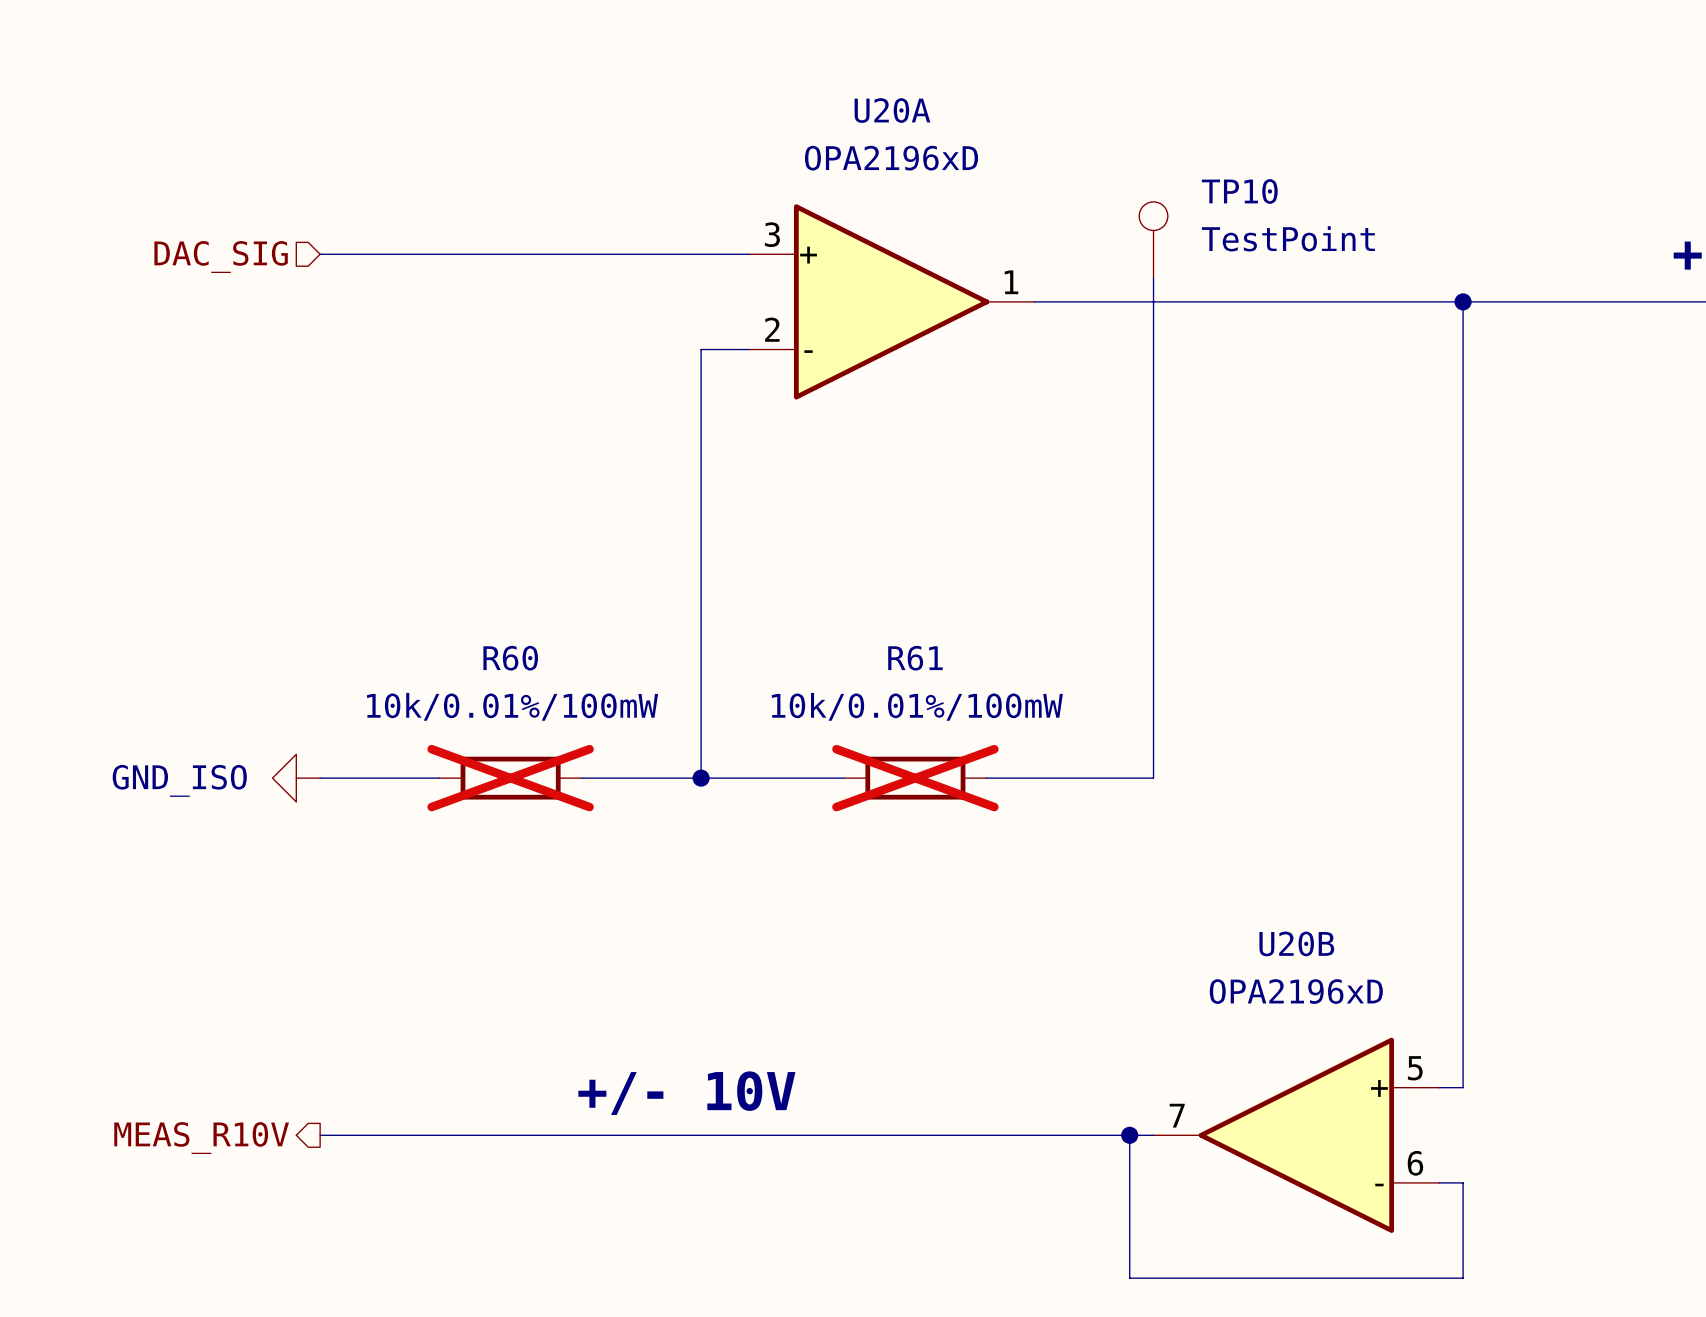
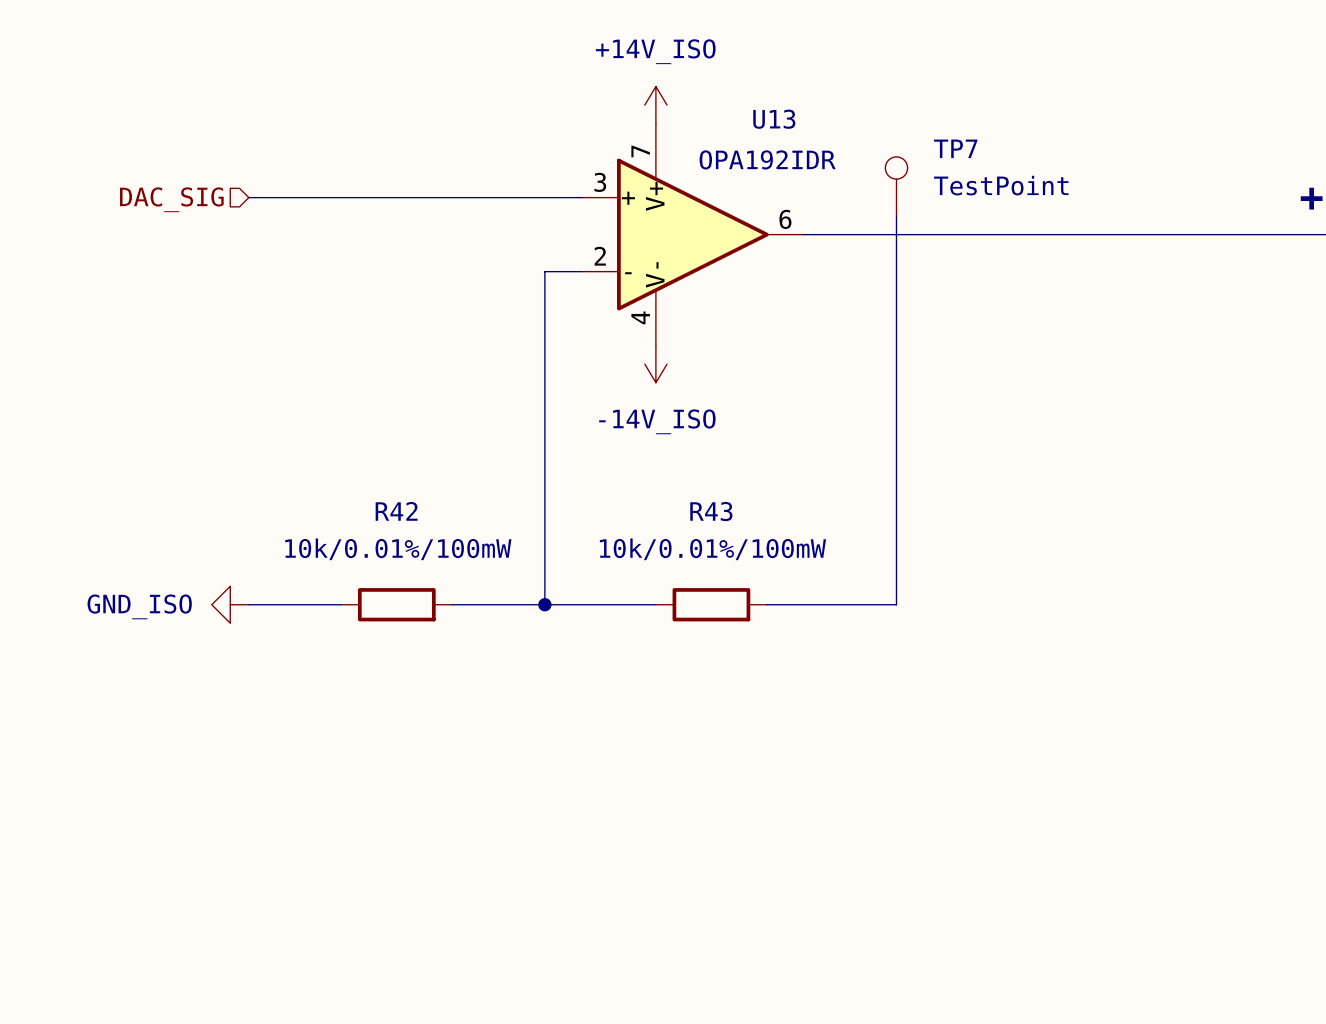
power symbol: none -> +14V_ISO (655, 105)
TP10 name: TP10 (1239, 191) -> TP7 (955, 148)
U20A: OPA2196xD (891, 301) -> none
U13: none -> OPA192IDR (692, 234)
wire: (1463, 301) (1463, 1087) (1439, 1087) -> none
junction: (1463, 301) -> none
power symbol: none -> -14V_ISO (655, 364)
R60 name: R60 (510, 658) -> R42 (396, 511)
R61 name: R61 (915, 658) -> R43 (711, 511)
R60 do-not-place cross: (510, 778) -> none
R61 do-not-place cross: (915, 778) -> none
text: +/- 10V (686, 1093) -> none
wire: (320, 1135) (1153, 1135) -> none
wire: (1129, 1135) (1129, 1278) (1463, 1278) (1463, 1182) (1439, 1182) -> none
junction: (1129, 1135) -> none
U20B: OPA2196xD (1296, 1135) -> none
hierarchical label: MEAS_R10V (201, 1138) -> none

